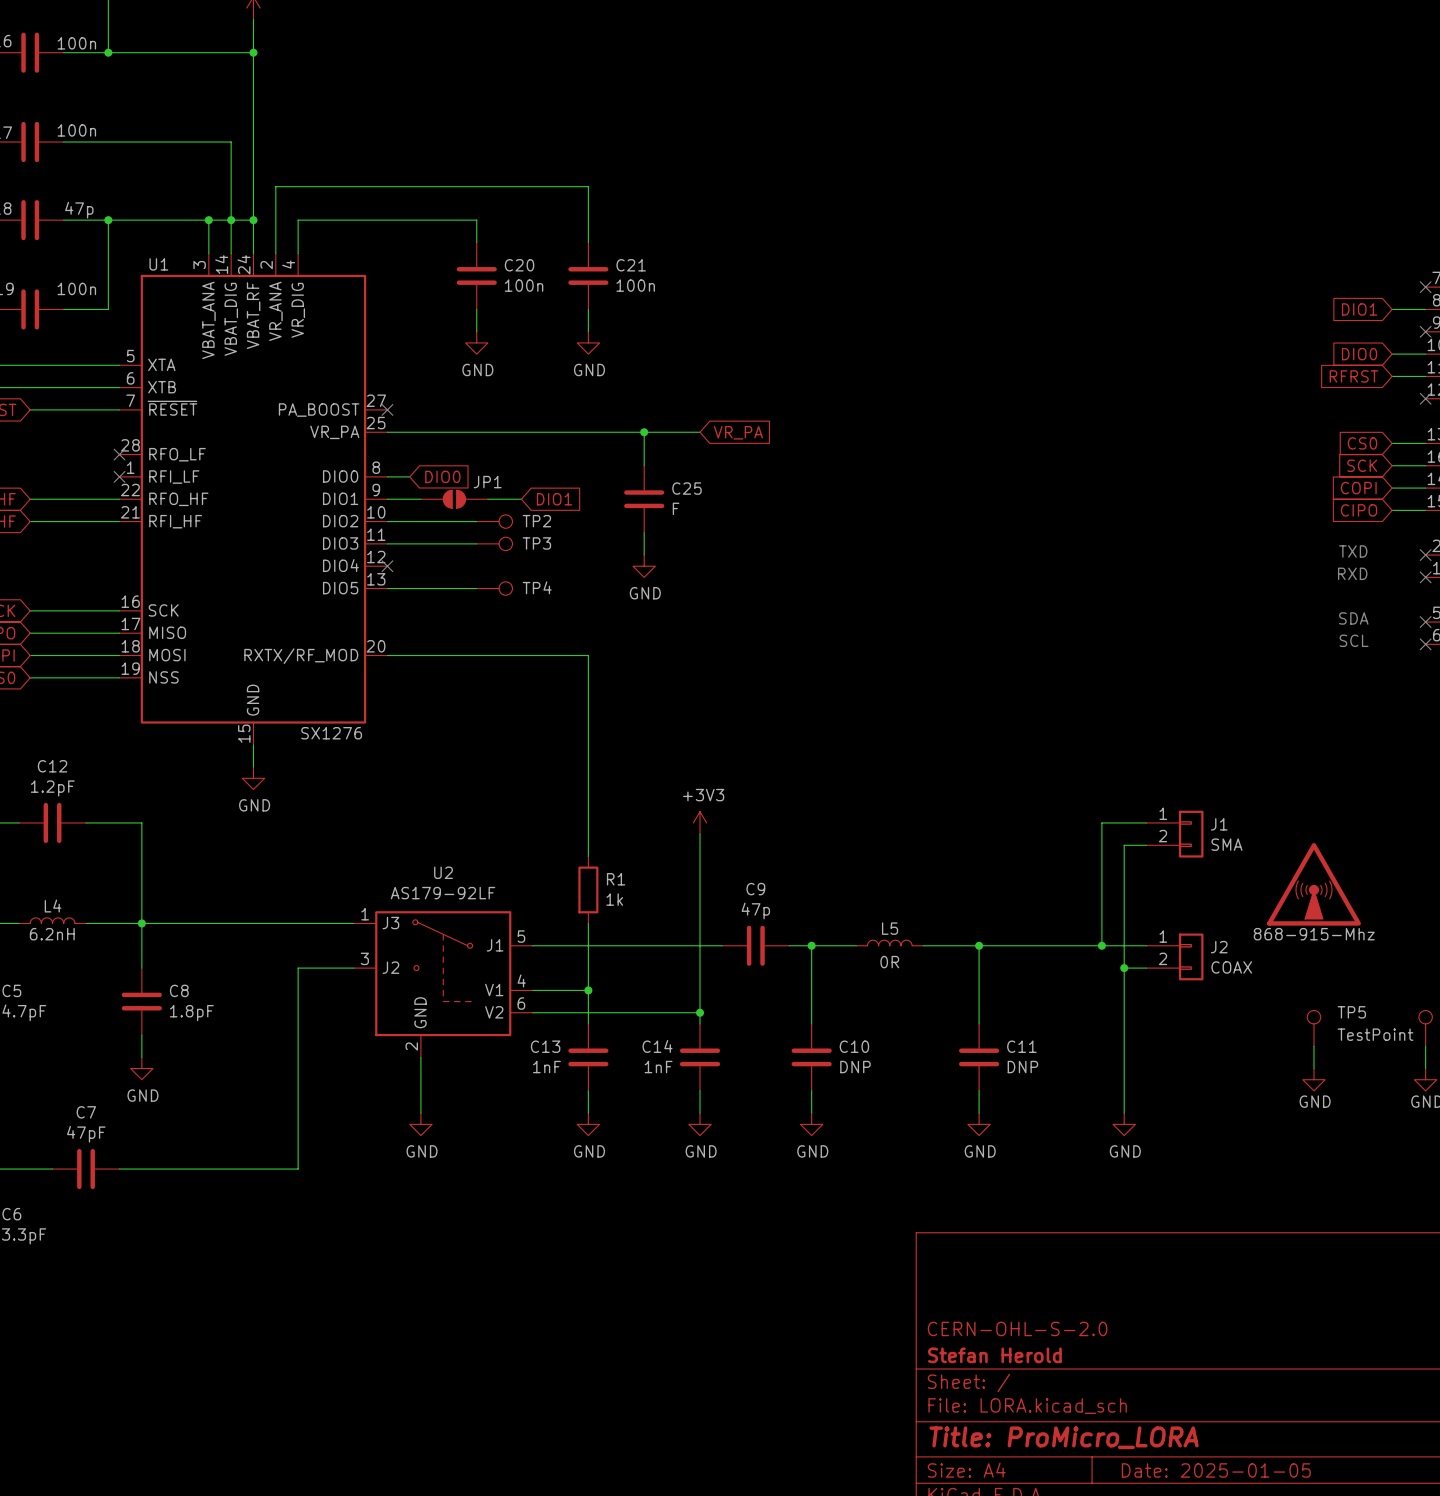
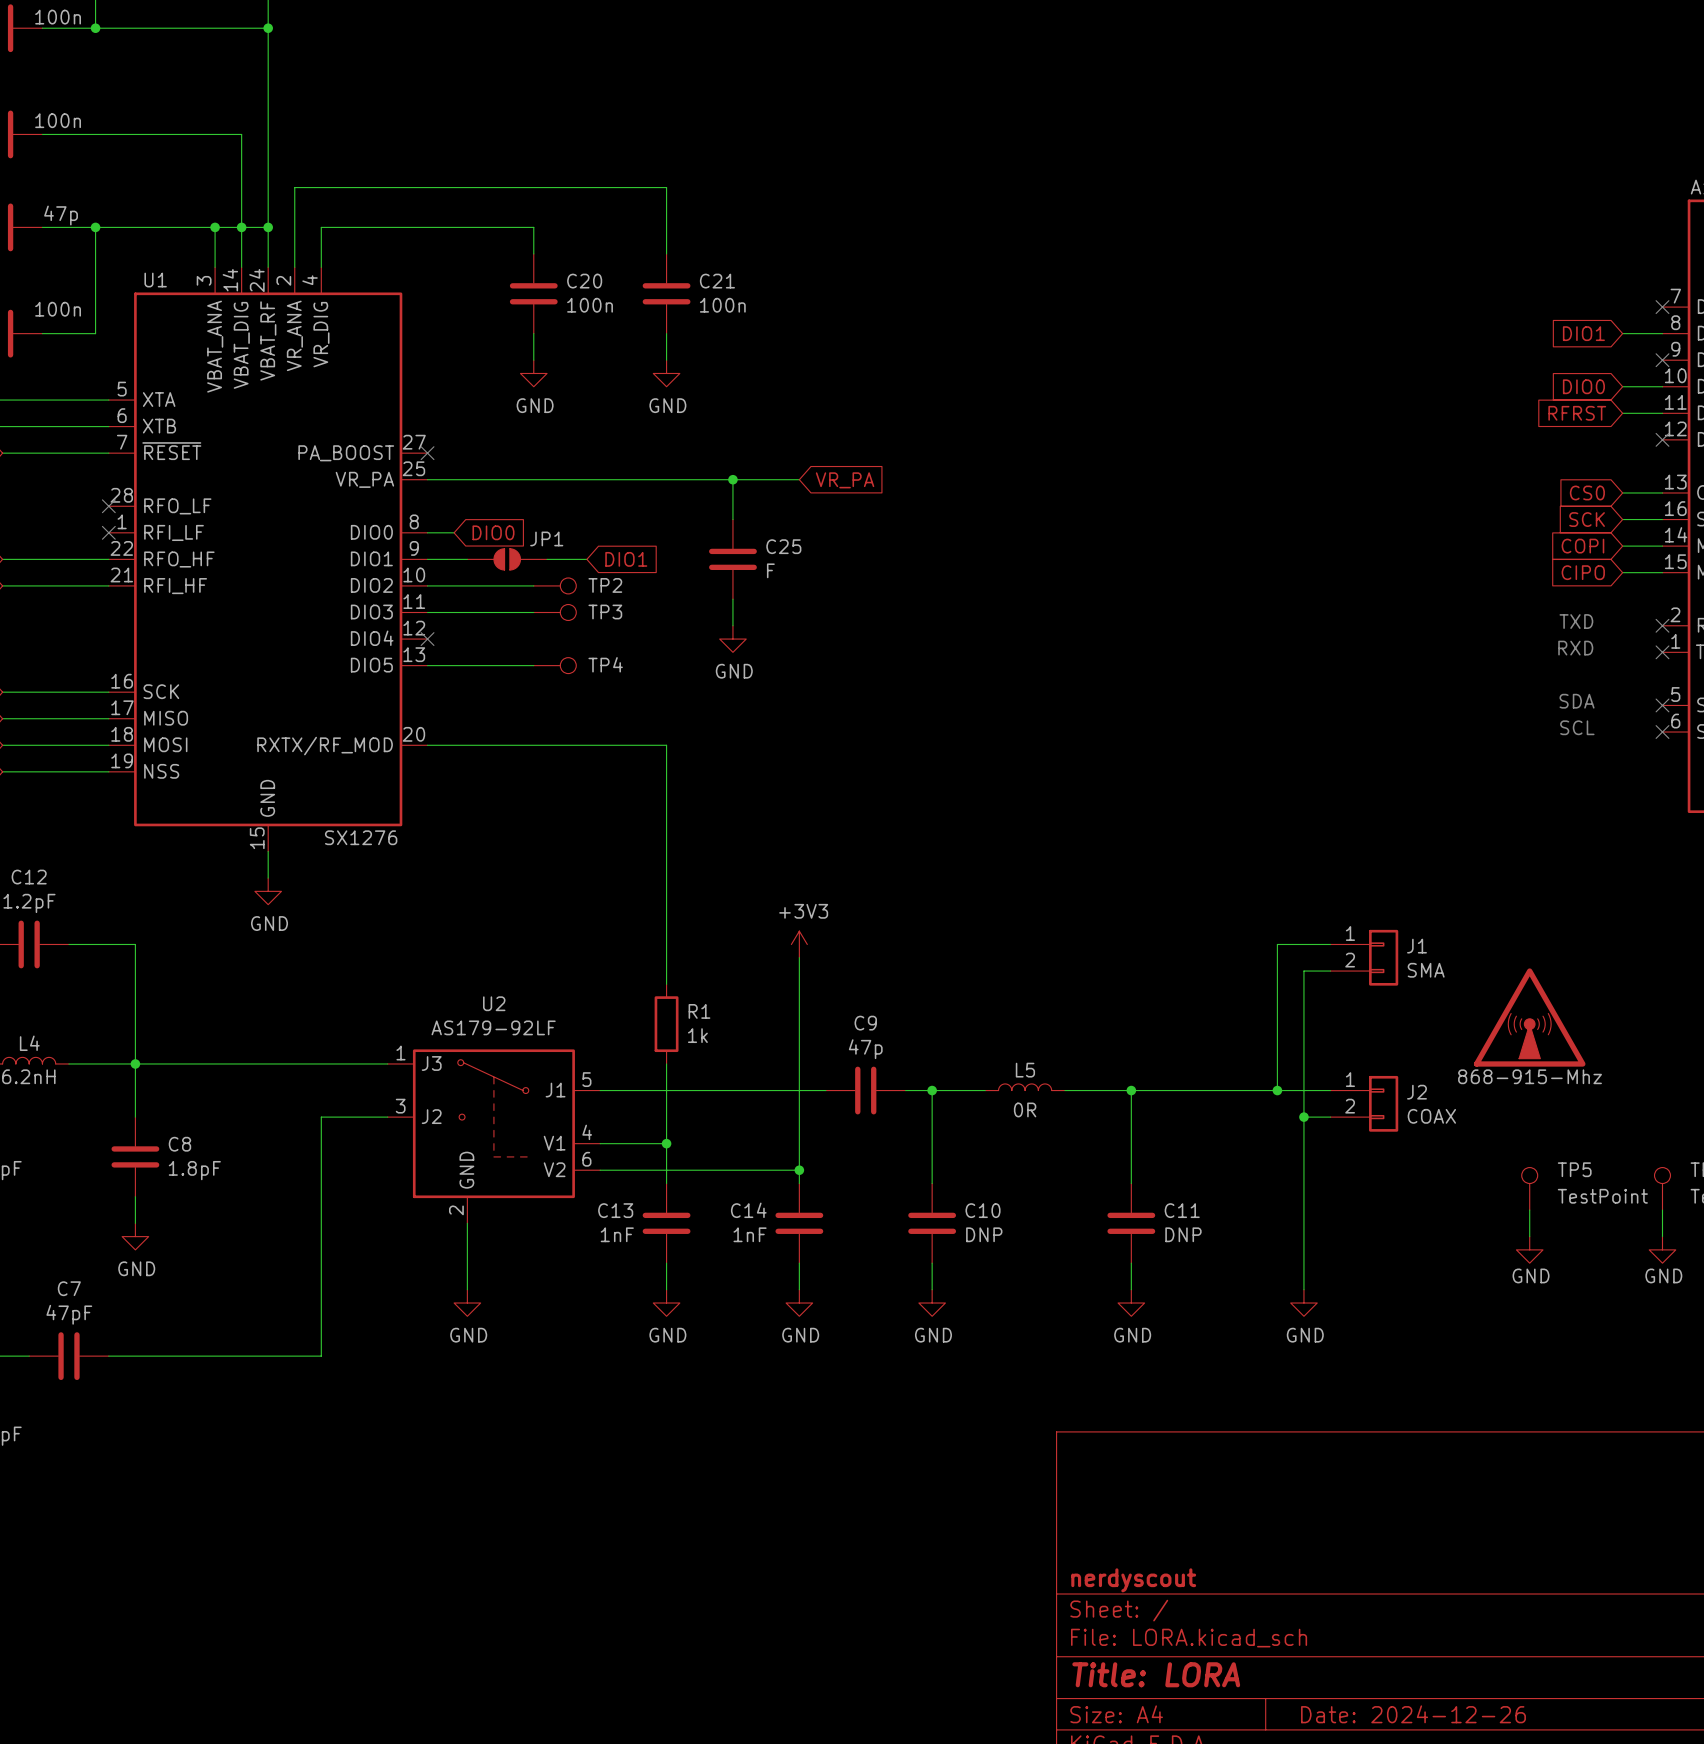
title block: CERN-OHL-S-2.0 (1017, 1328) -> none
title block: Stefan Herold (994, 1355) -> nerdyscout (1133, 1580)
title block: Title: ProMicro_LORA (1064, 1437) -> Title: LORA (1156, 1674)
title block: Date: 2025-01-05 (1216, 1470) -> Date: 2024-12-26 (1413, 1714)

